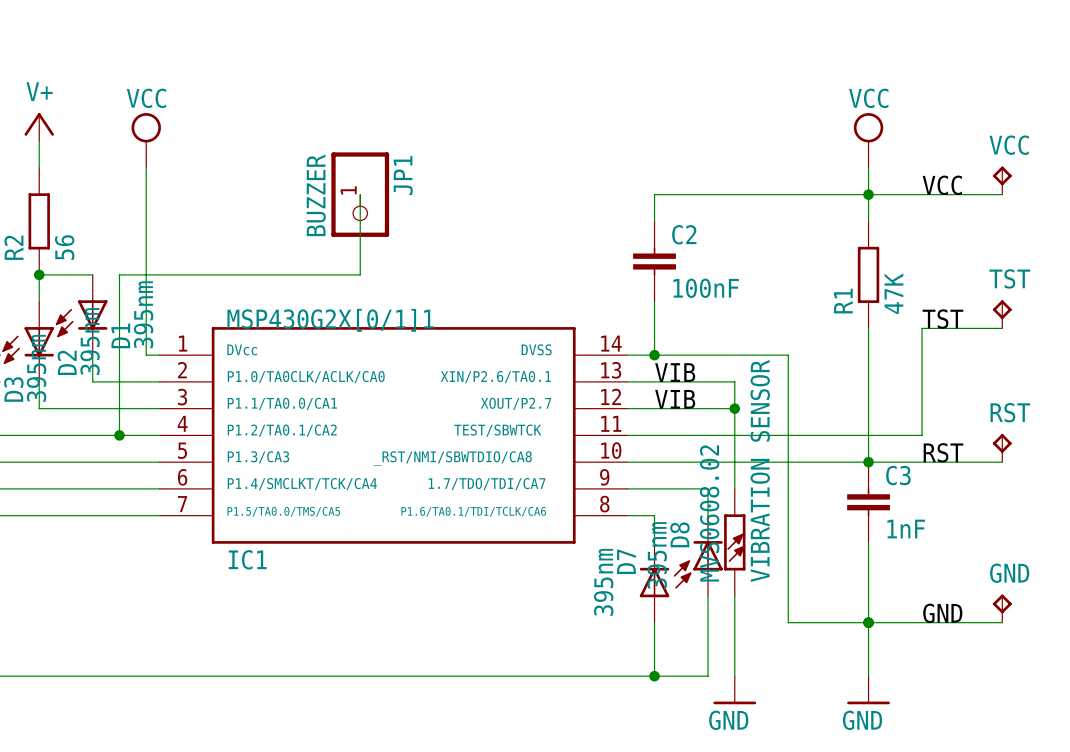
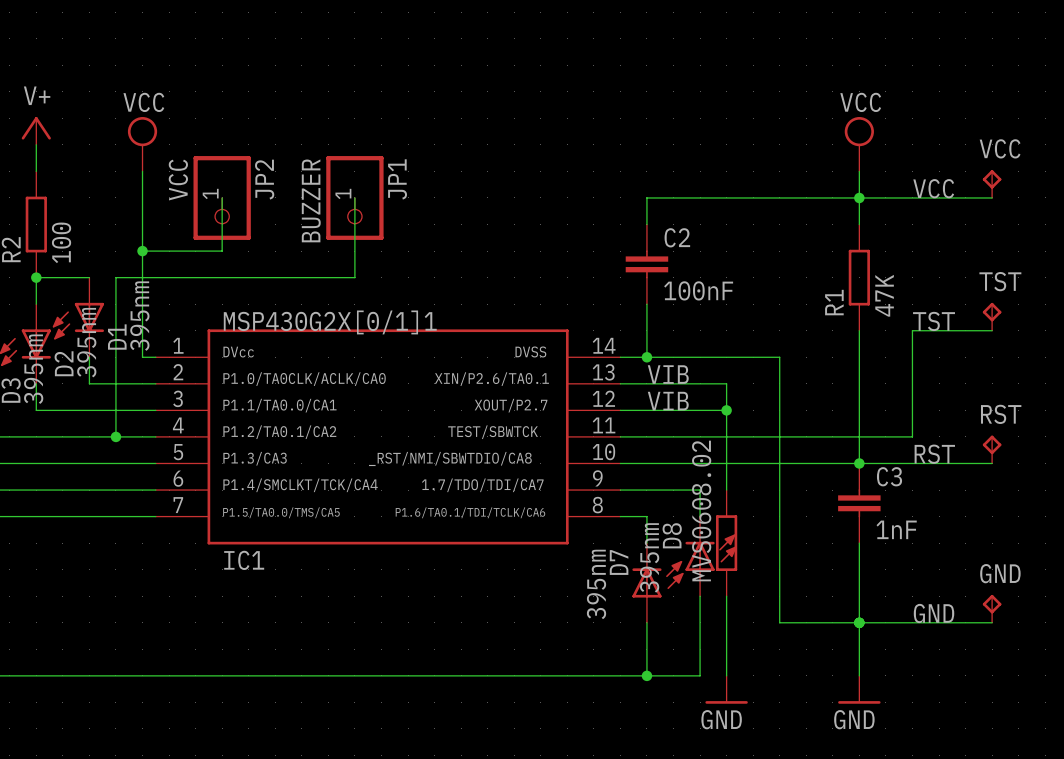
wire: none -> (222, 197) (222, 251) (142, 251)
JP2: none -> VCC (222, 197)
R2 value: 56 (64, 247) -> 100 (61, 242)
junction: none -> (142, 251)
MVS0608.02 value: VIBRATION SENSOR (760, 470) -> none

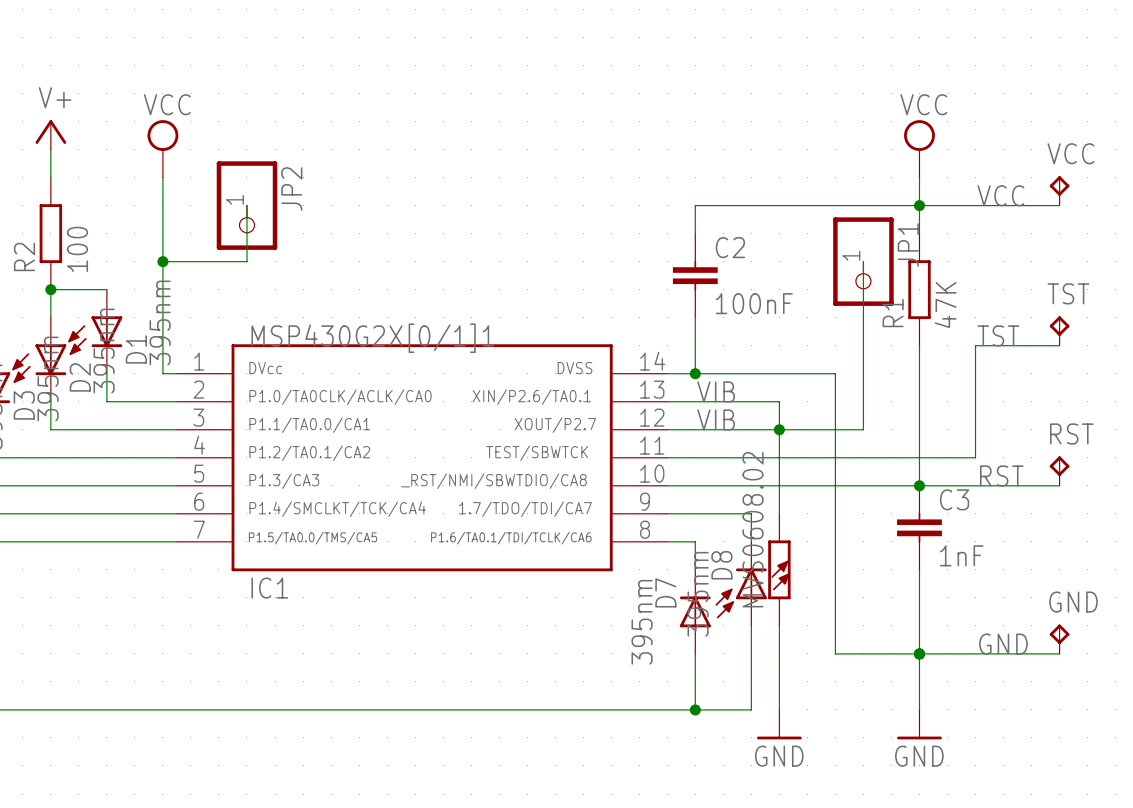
JP2 value: VCC (178, 180) -> none
wire: (354, 197) (354, 277) (115, 277) (115, 436) -> none
JP1 position: (354, 197) -> (863, 261)
JP1 value: BUZZER (311, 200) -> none
wire: none -> (863, 261) (863, 429) (779, 429)
junction: (115, 436) -> none

